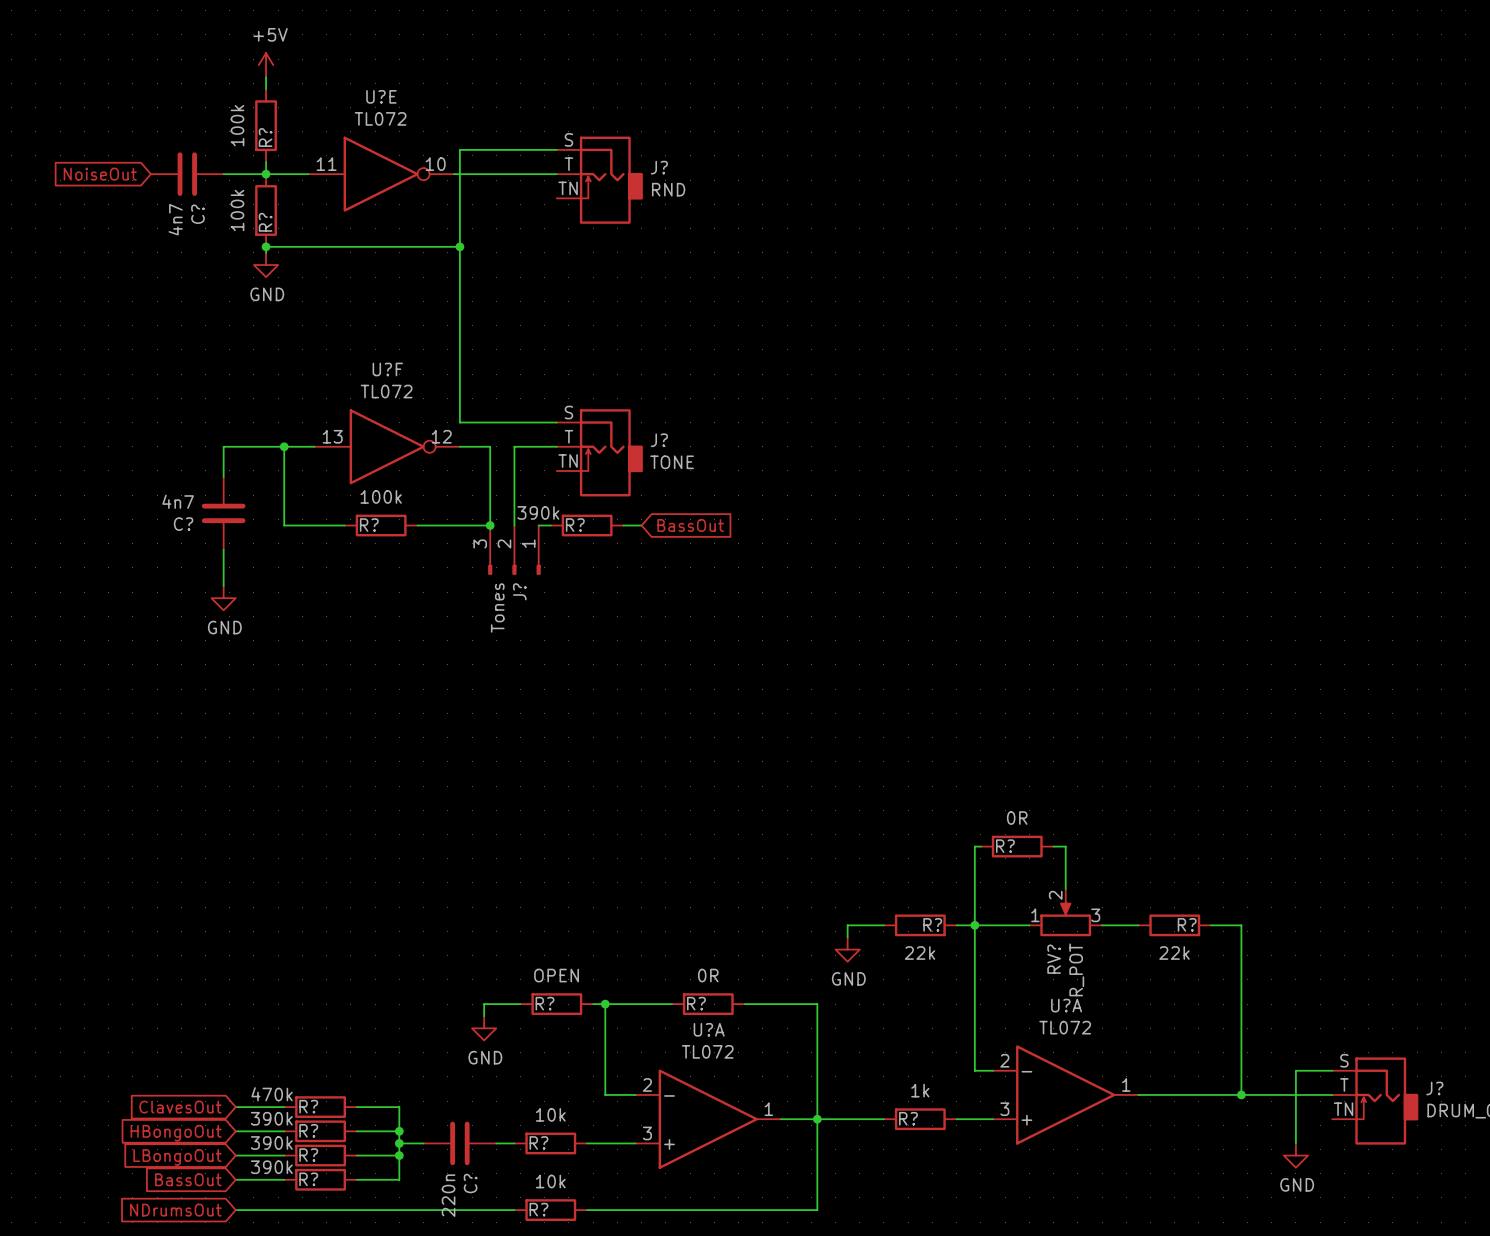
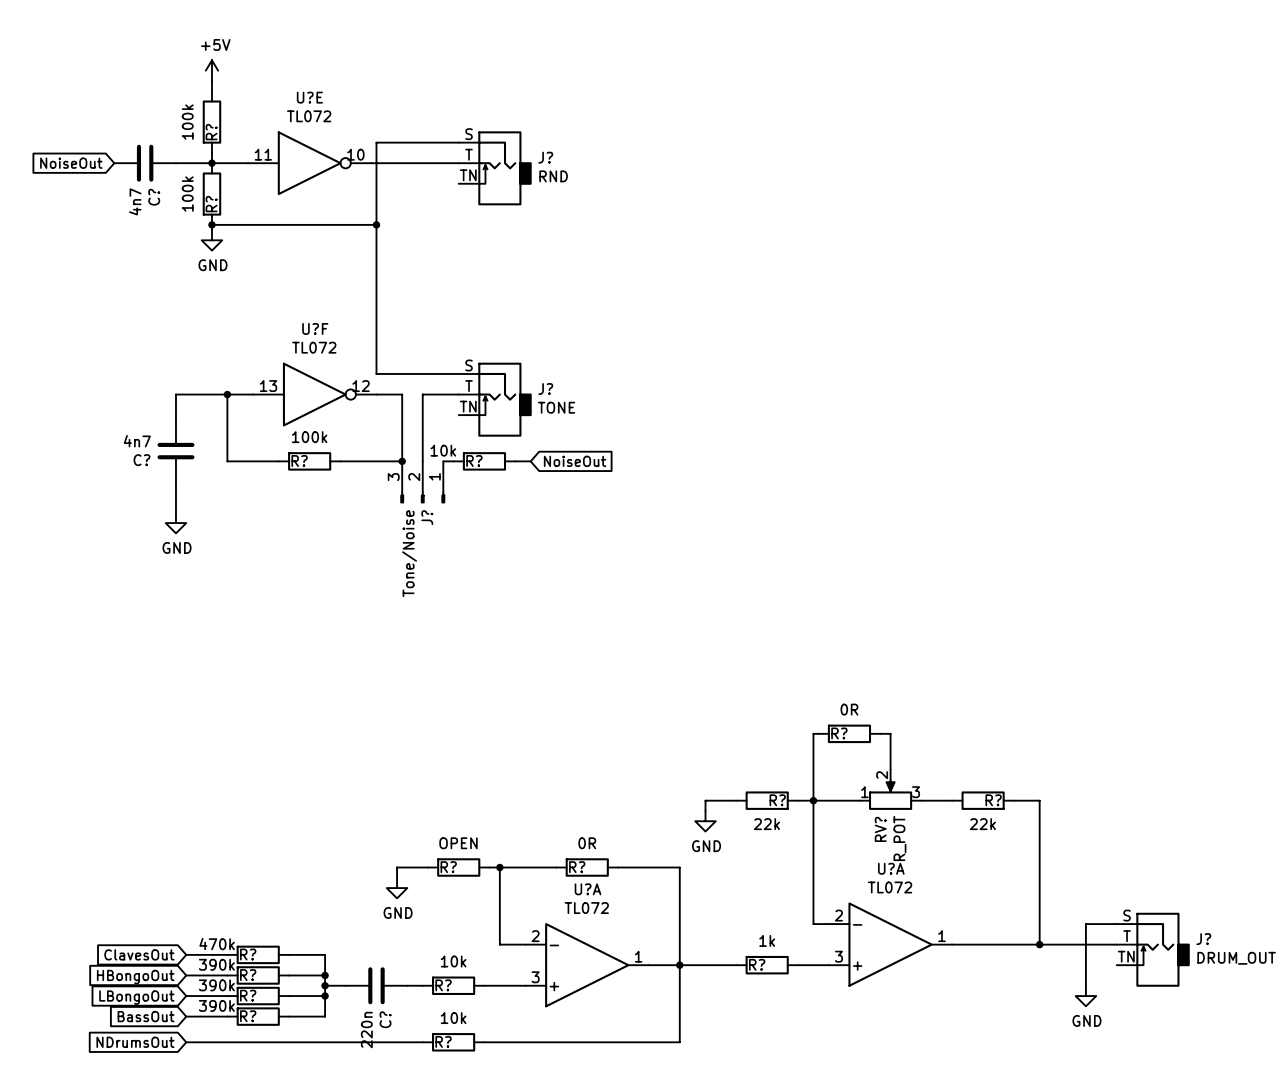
R? value: 390k (538, 512) -> 10k (443, 450)
global label: BassOut (690, 525) -> NoiseOut (575, 461)
J? value: Tones (497, 607) -> Tone/Noise (409, 553)

